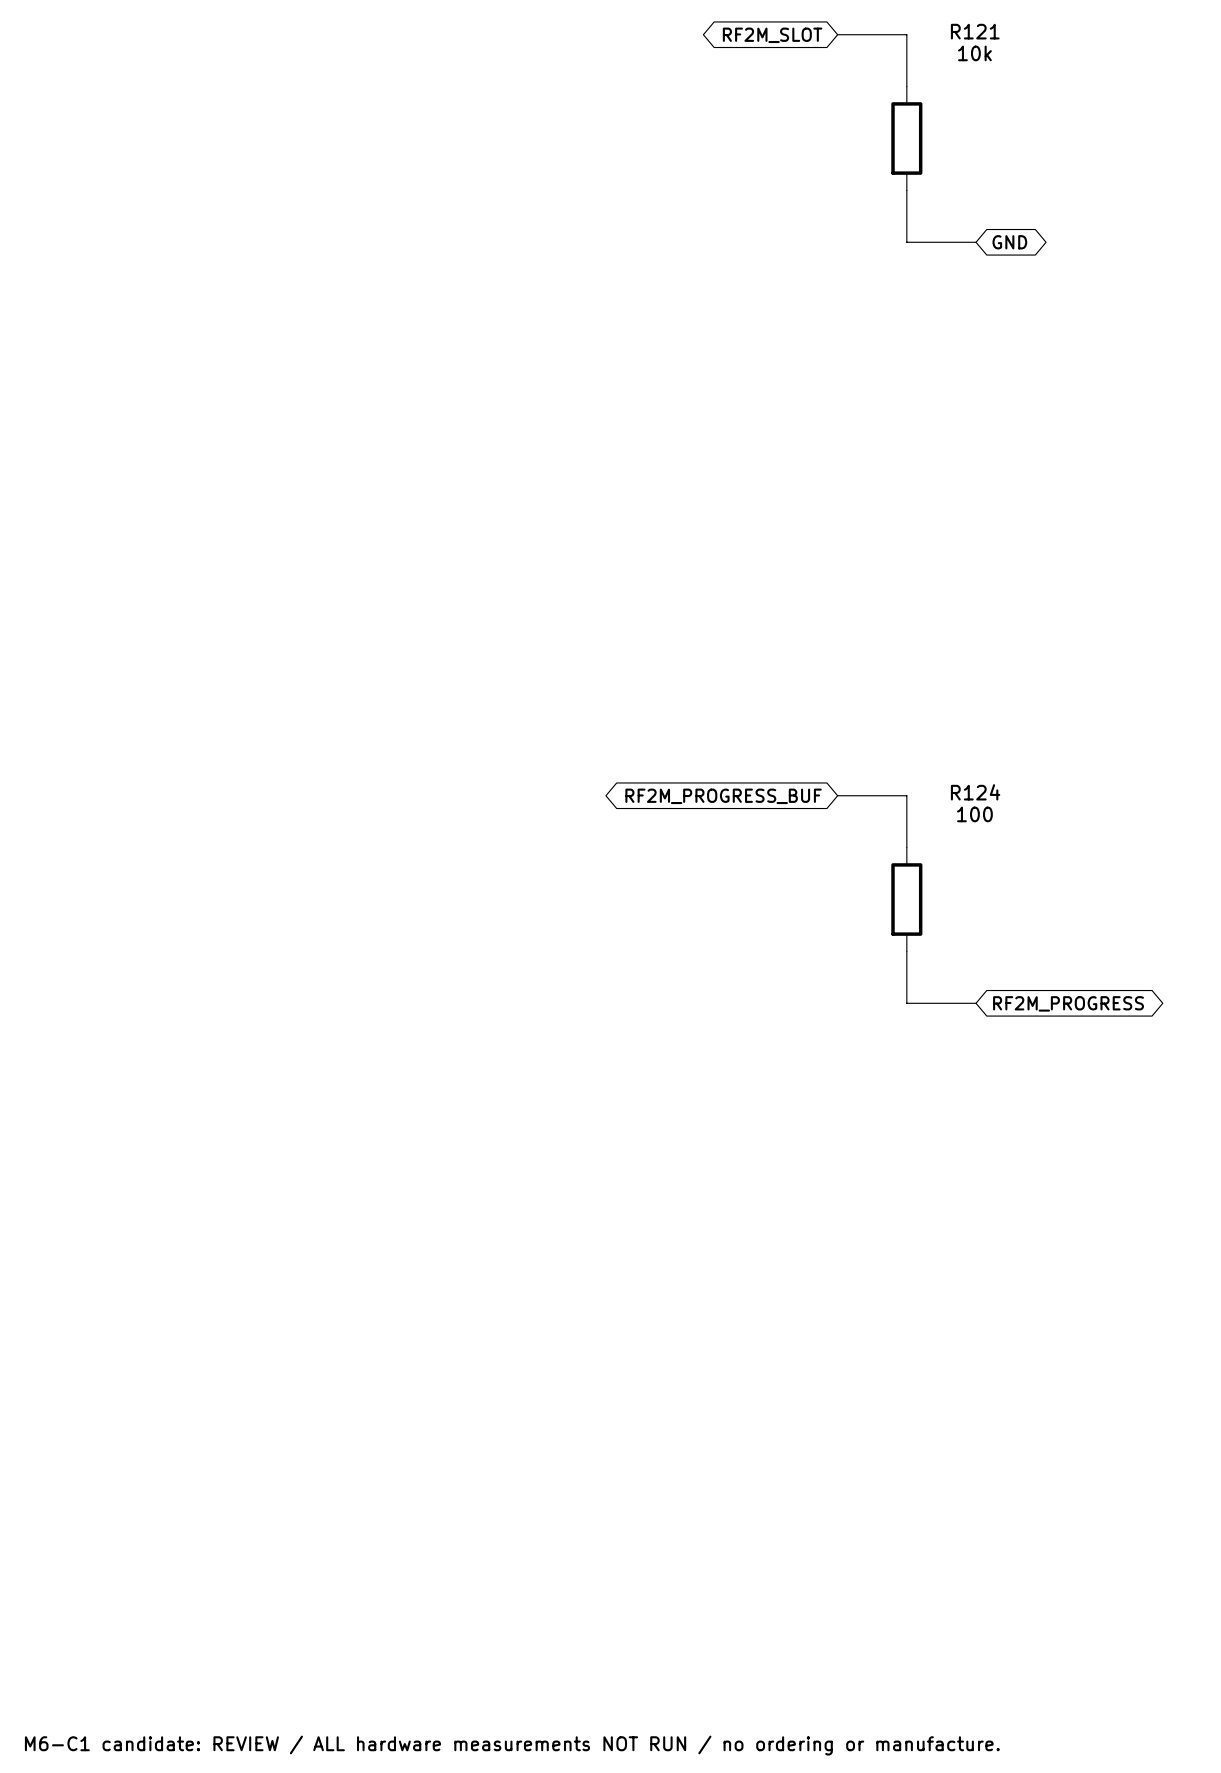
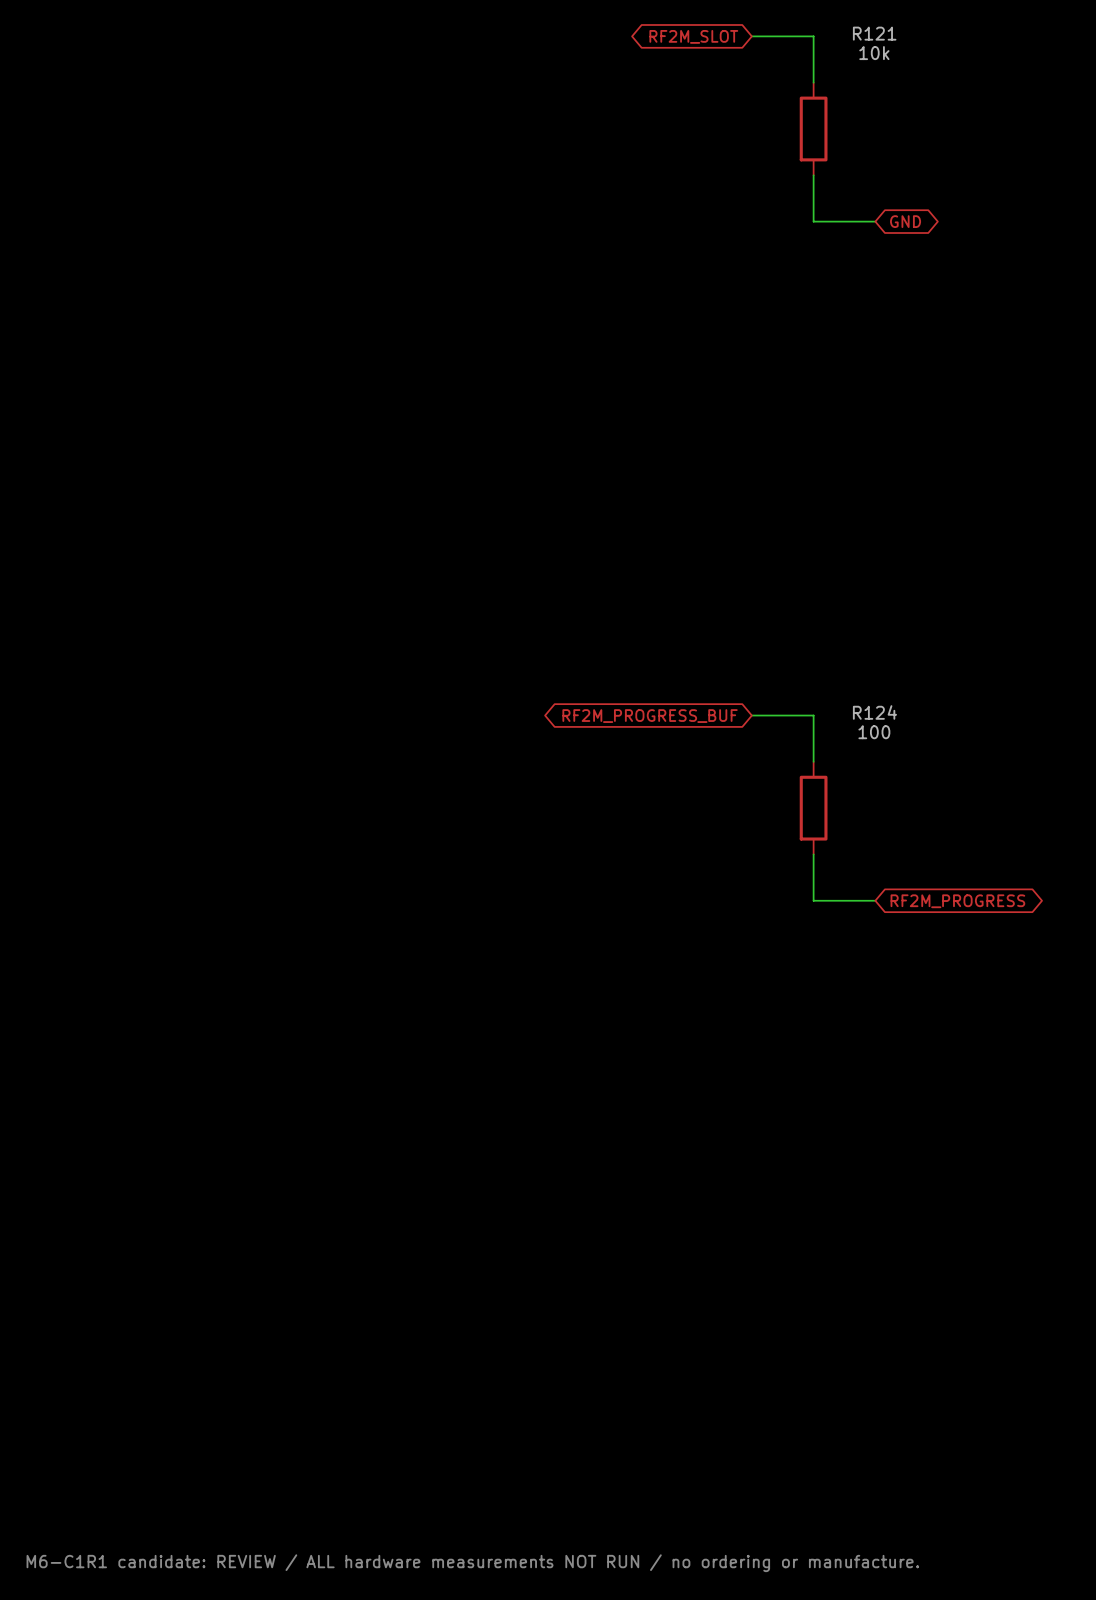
text: M6-C1 candidate: REVIEW / ALL hardware measurements NOT RUN / no ordering or manufacture. (512, 1745) -> M6-C1R1 candidate: REVIEW / ALL hardware measurements NOT RUN / no ordering or manufacture. (472, 1563)

